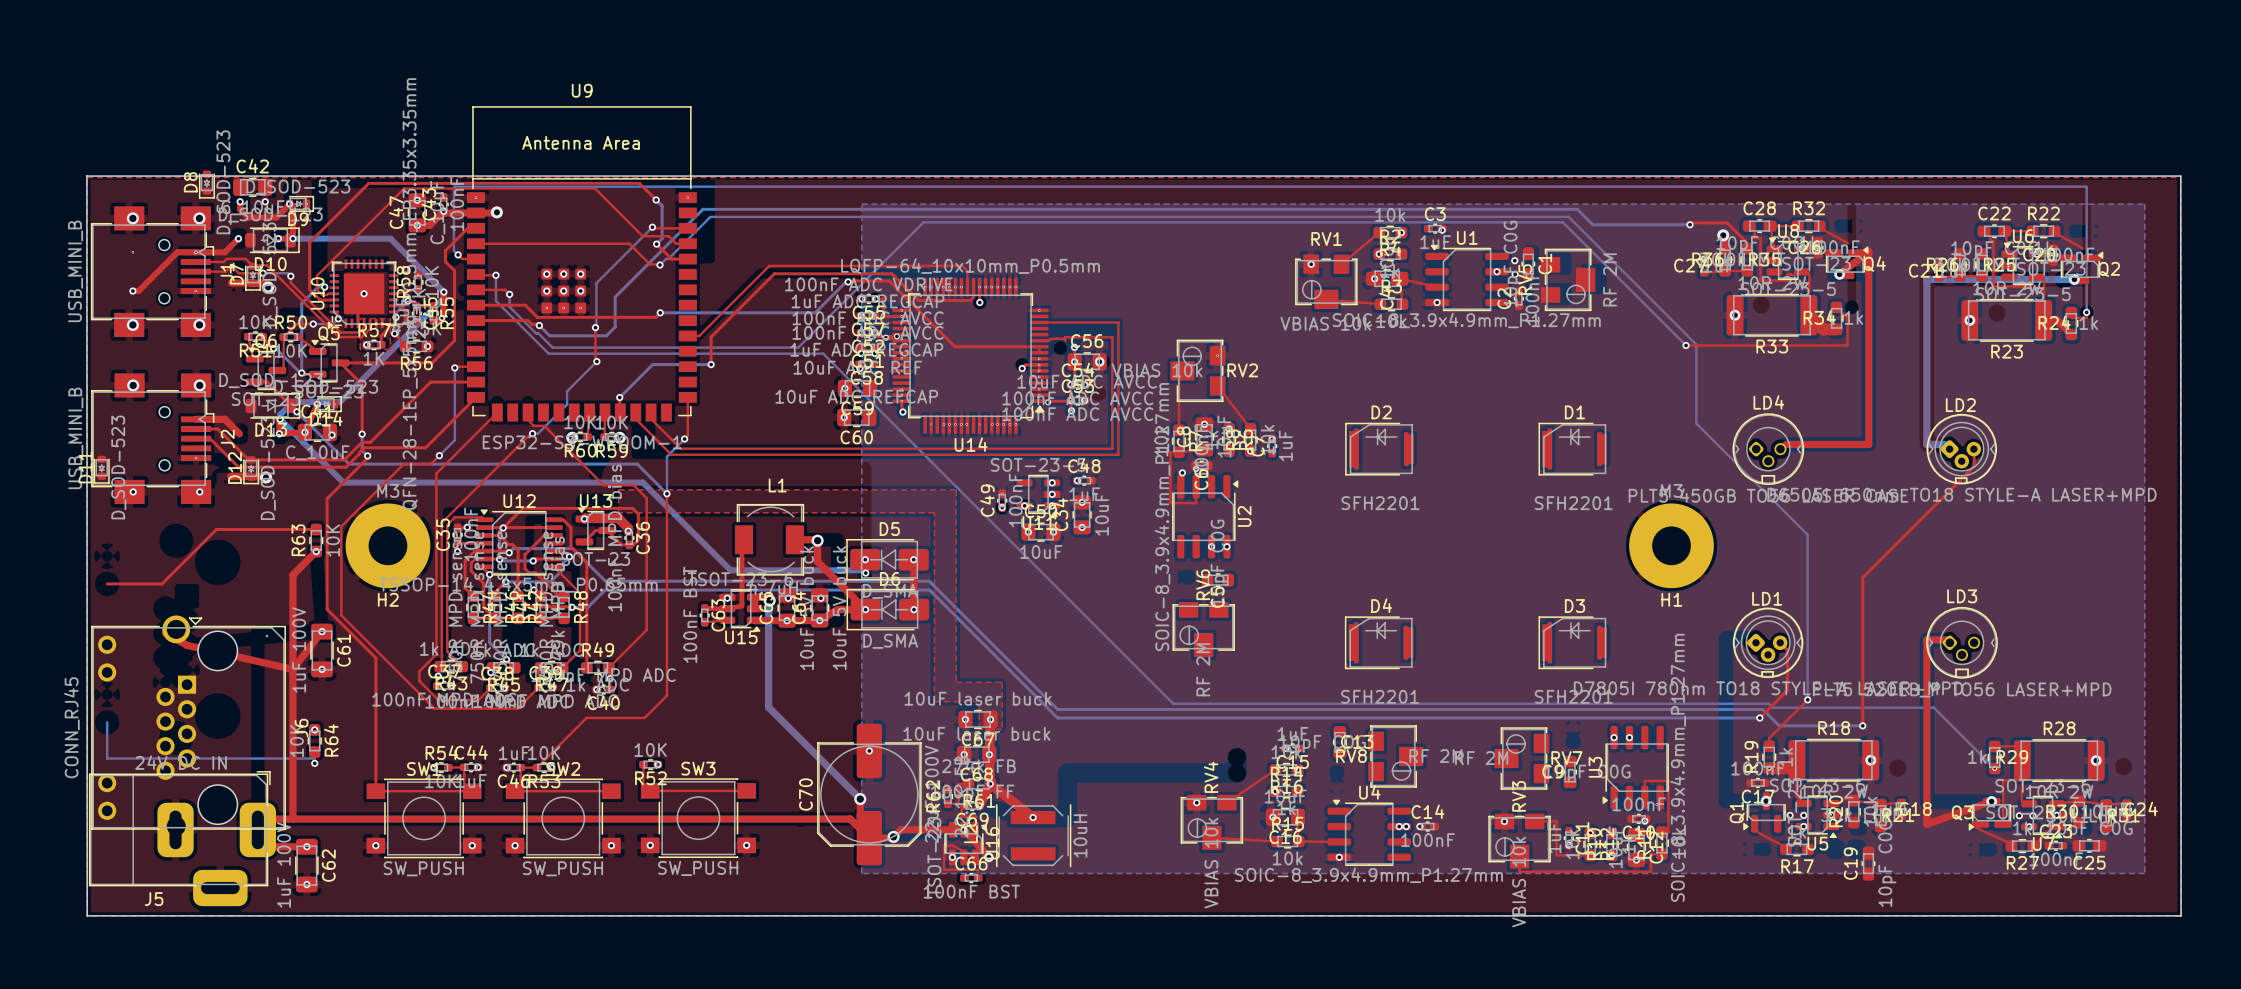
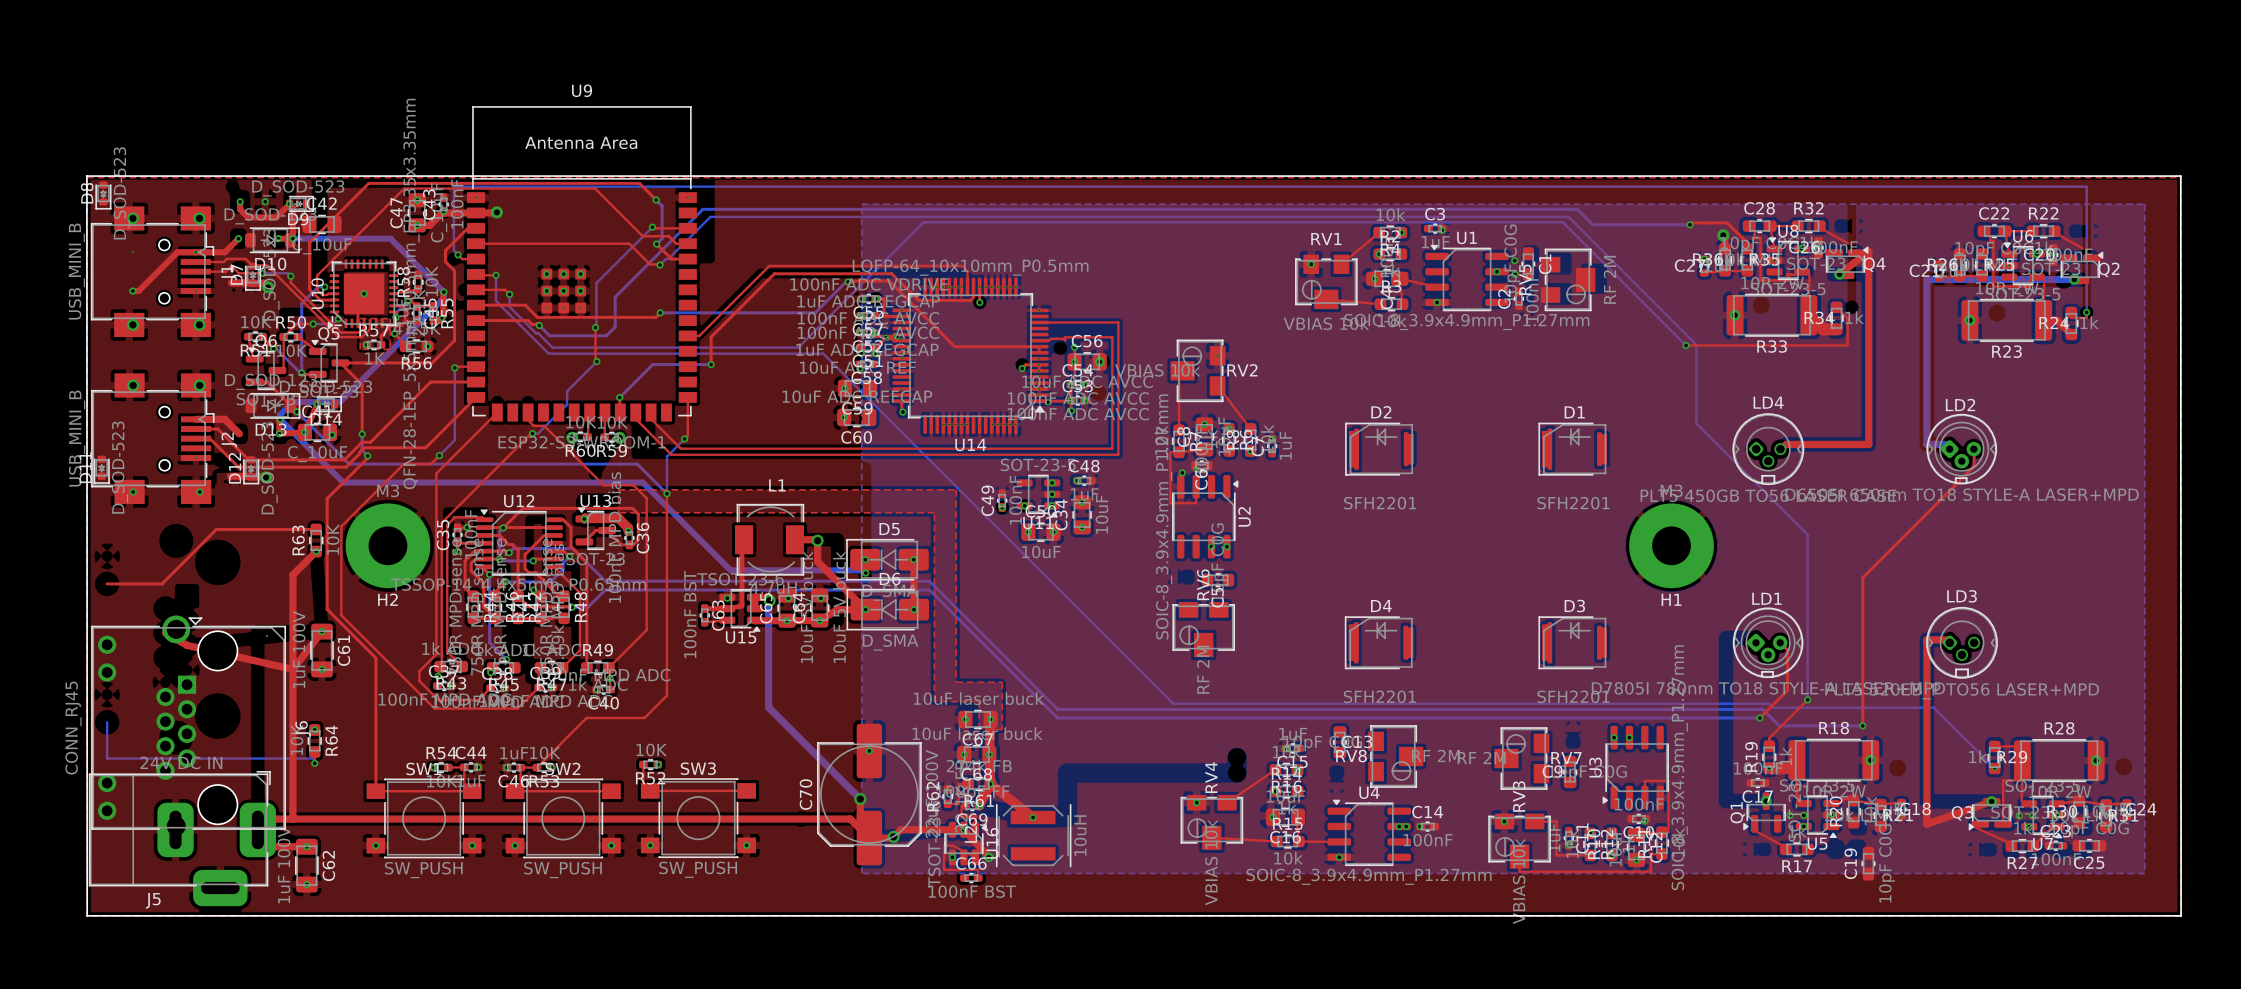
D8 position: (206, 184) -> (103, 195)
C42 position: (252, 187) -> (322, 224)

